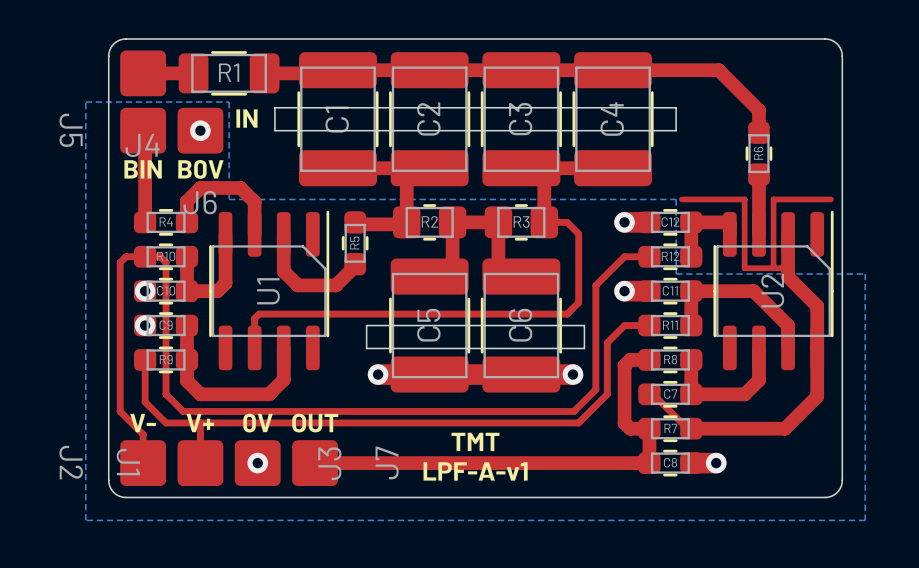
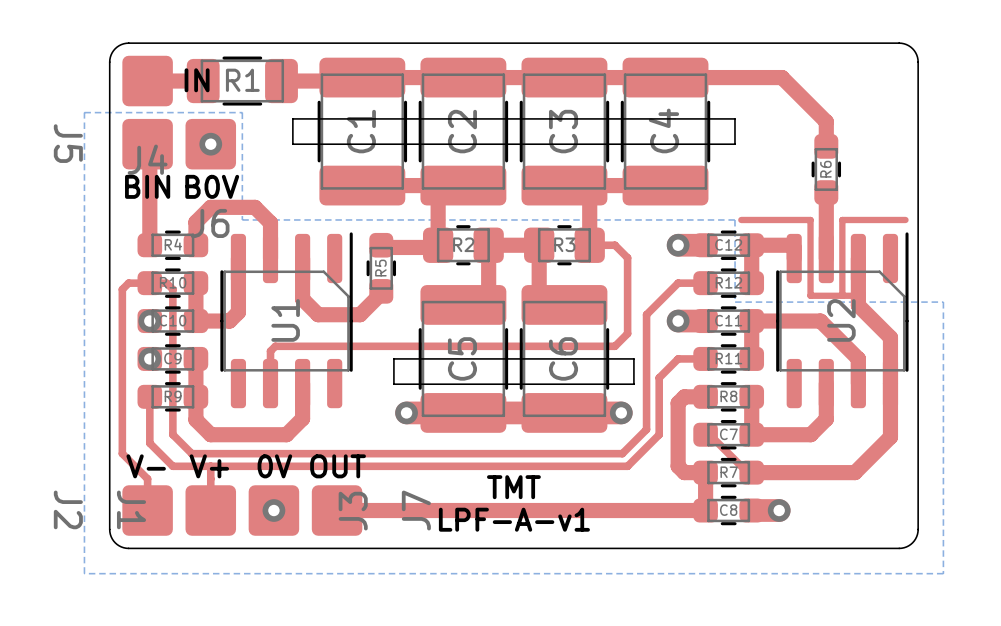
text position: IN (246, 118) -> IN (197, 80)

